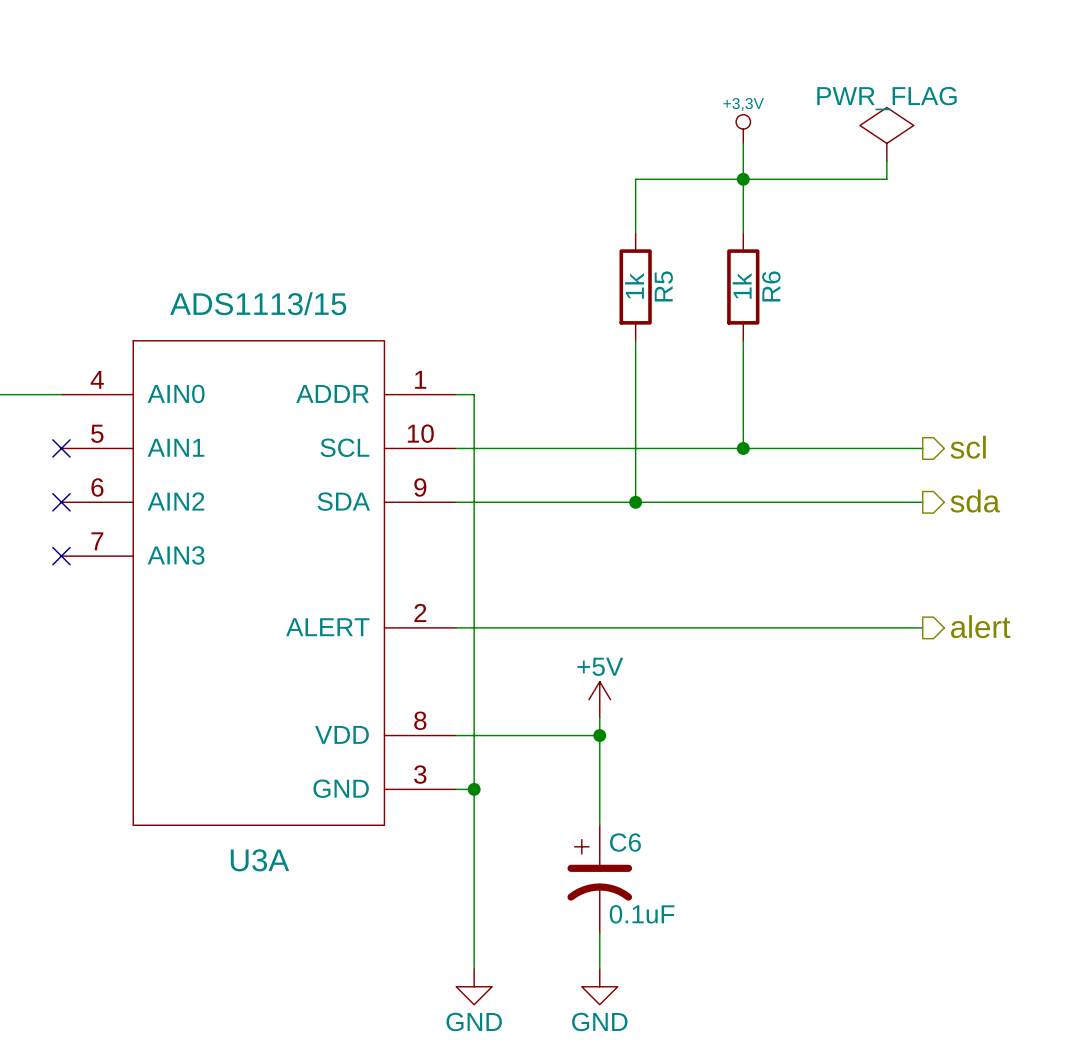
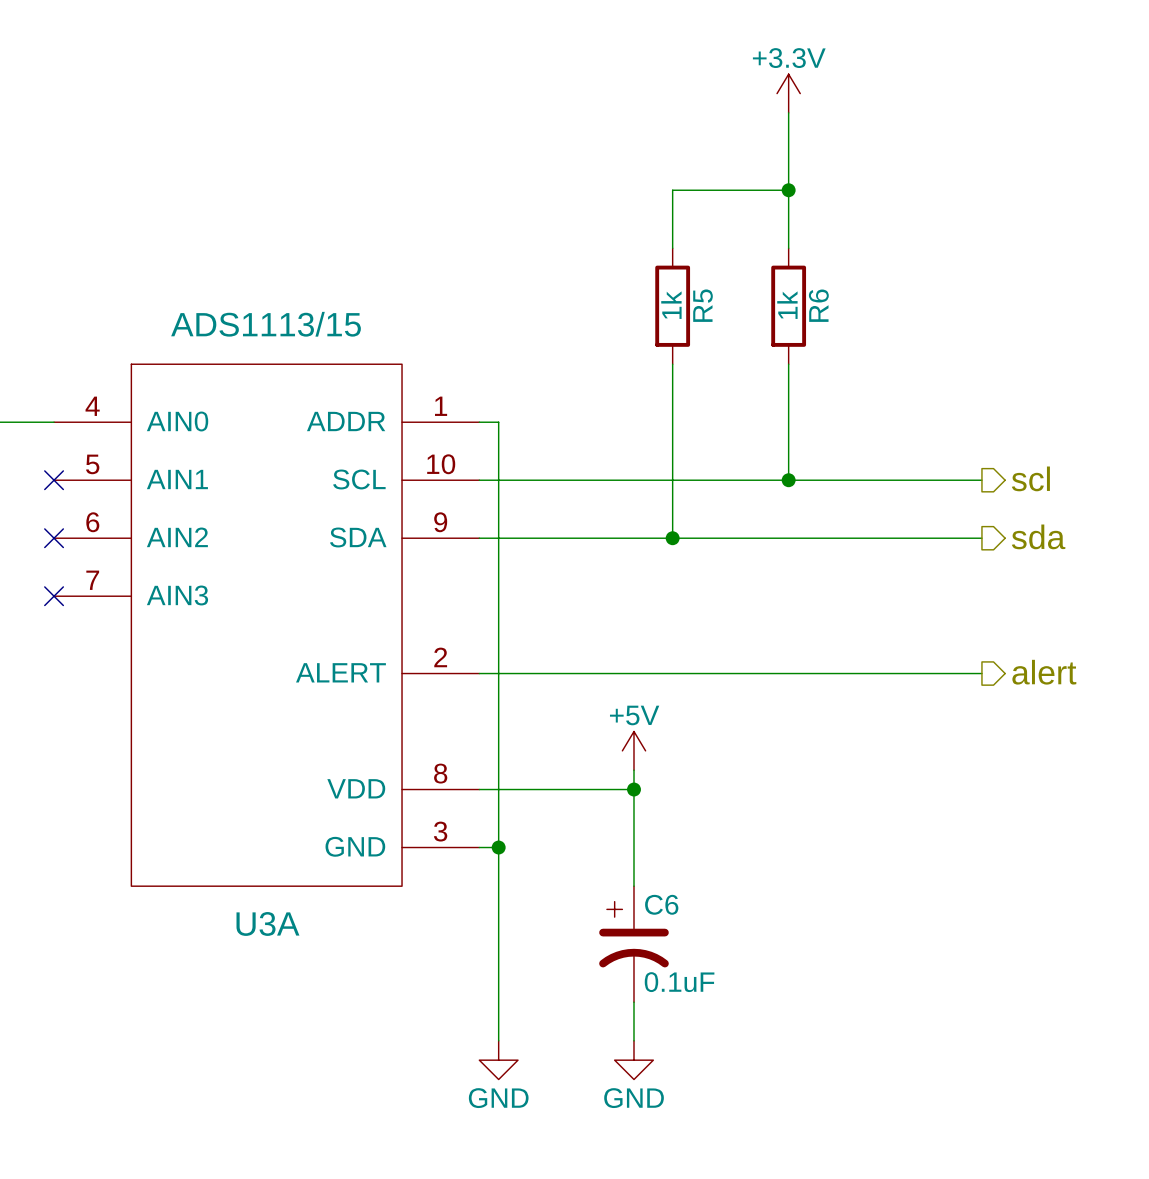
power symbol: none -> +3.3V (788, 93)
wire: none -> (788, 112) (788, 151)
power symbol: +3,3V (743, 129) -> none
power symbol: PWR_FLAG (886, 134) -> none
wire: (886, 161) (886, 179) (743, 179) -> none

